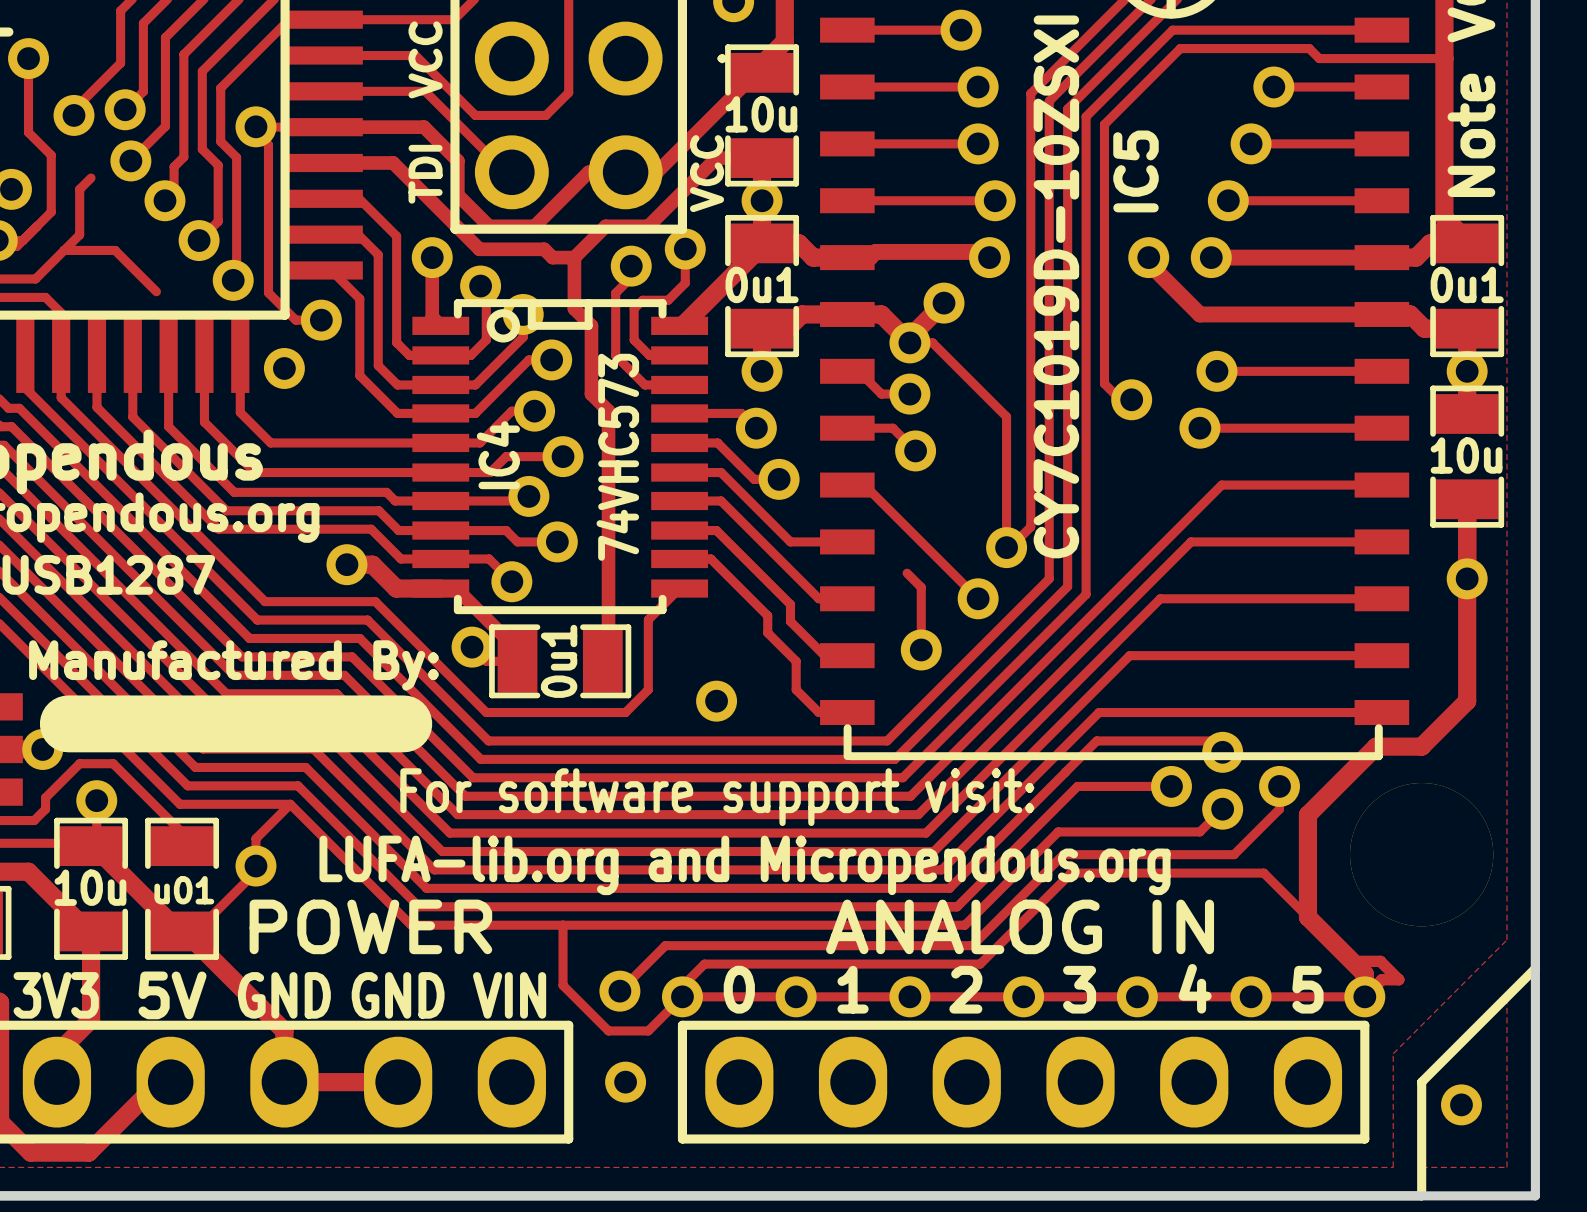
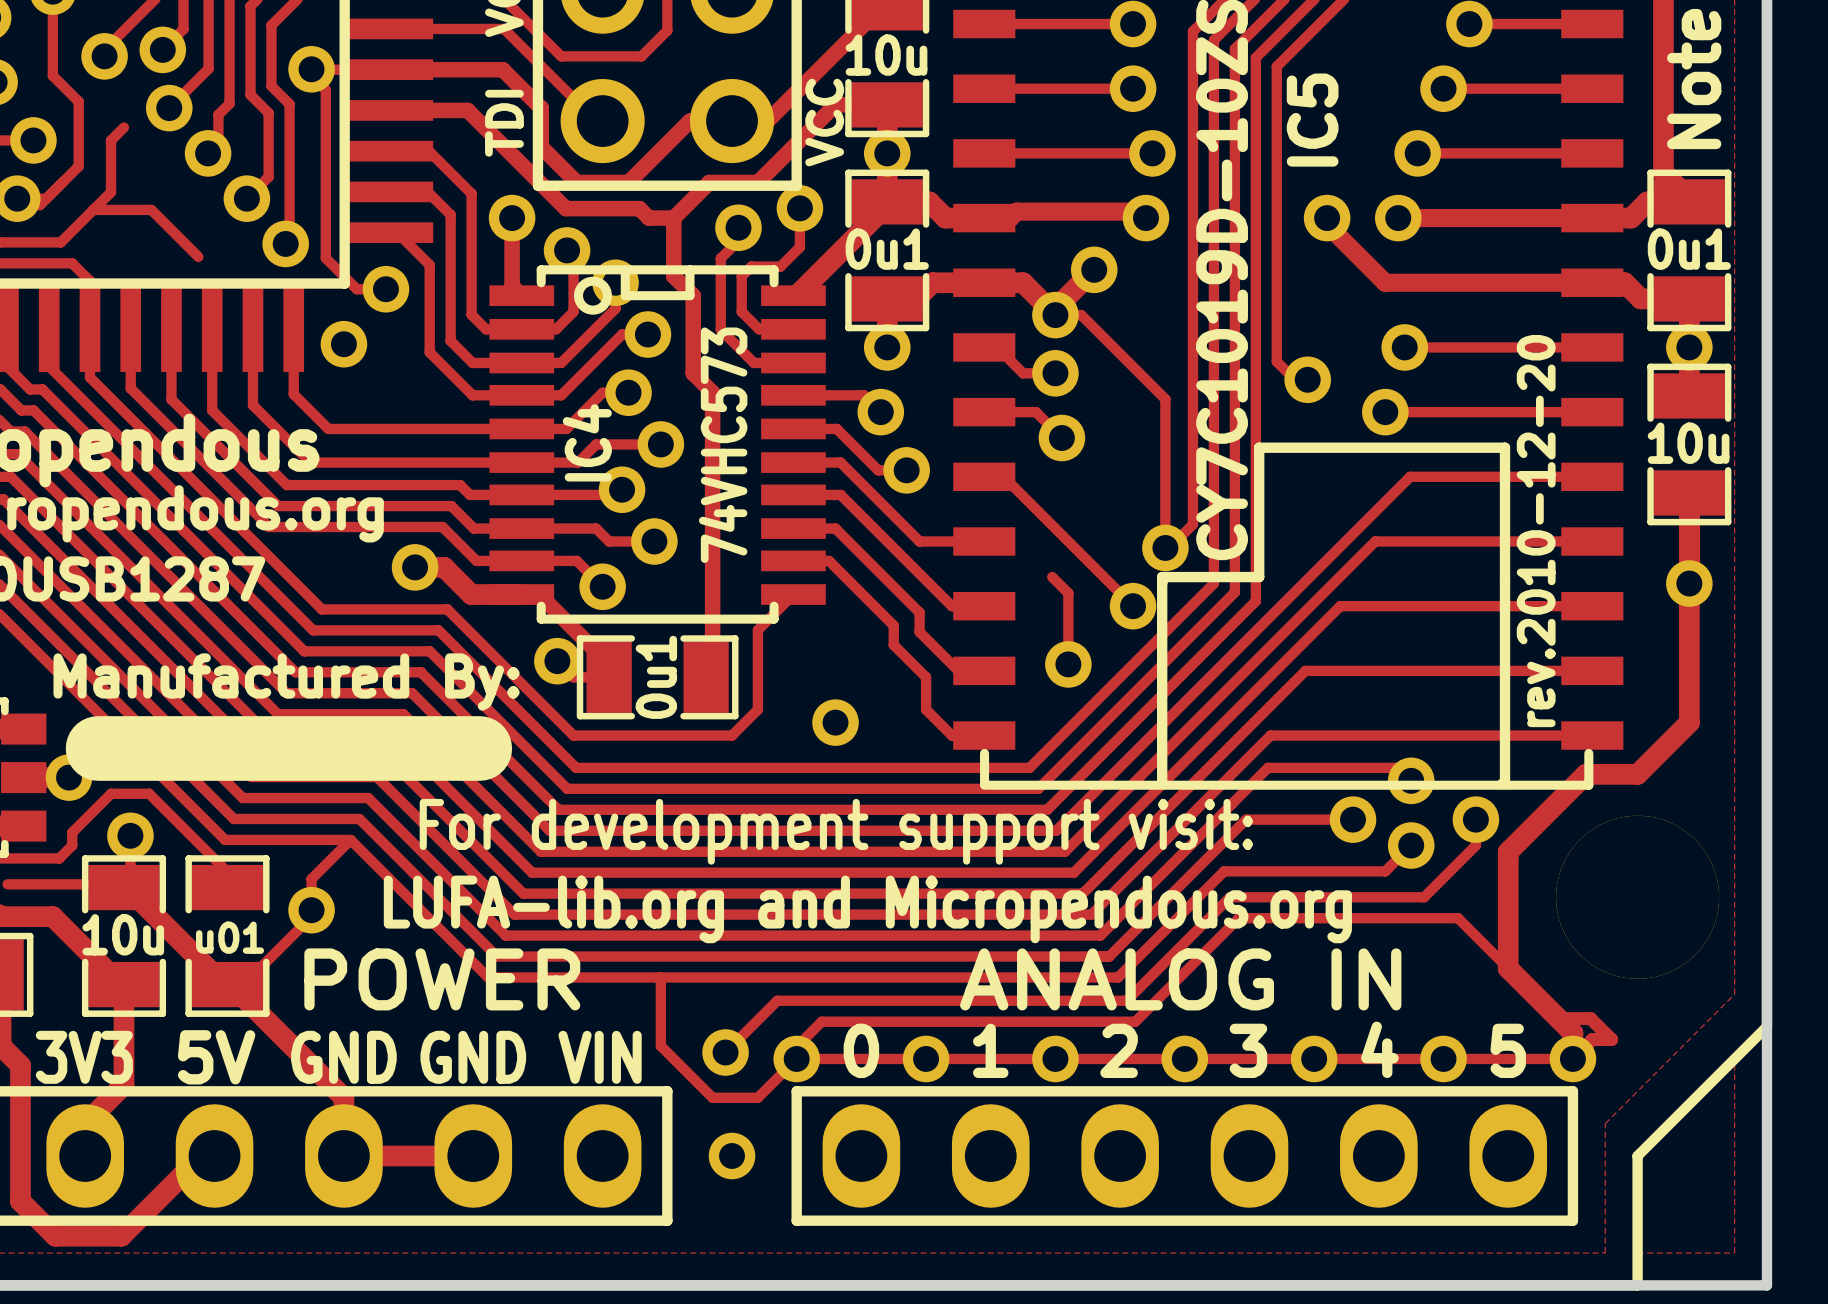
text: none -> rev.2010-12-20 (1536, 531)
line: none -> (1162, 784) (1162, 577) (1259, 577) (1259, 447) (1505, 447) (1505, 784) (1501, 784)
text: For software support visit: (717, 797) -> For development support visit: (836, 831)
part: (1461, 1104) -> none

